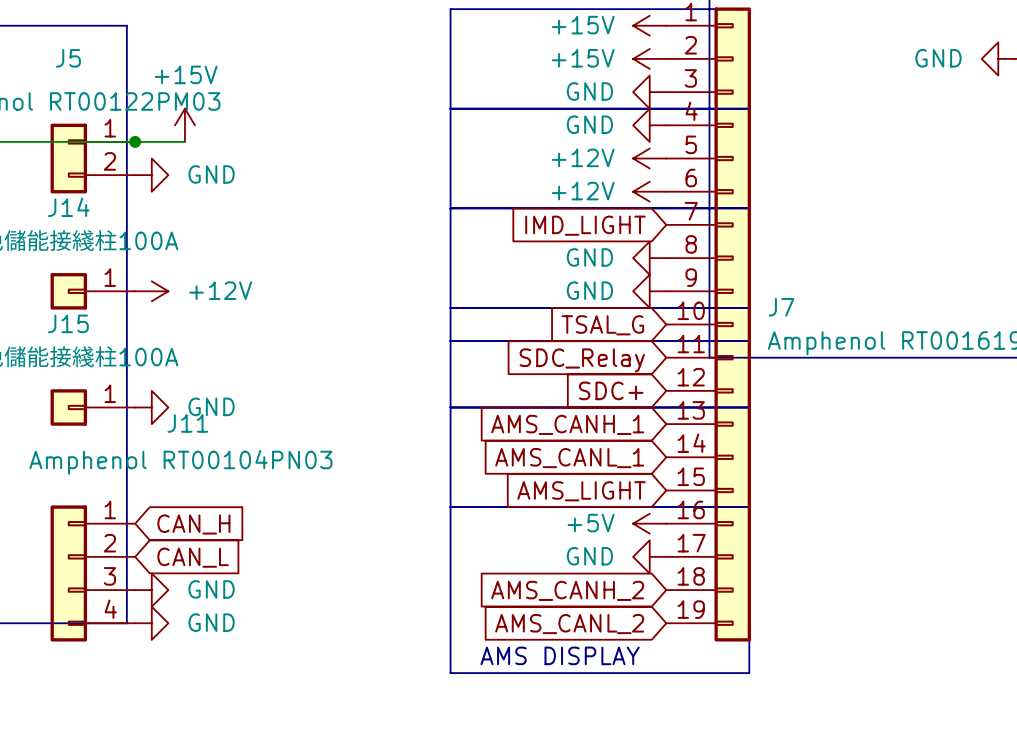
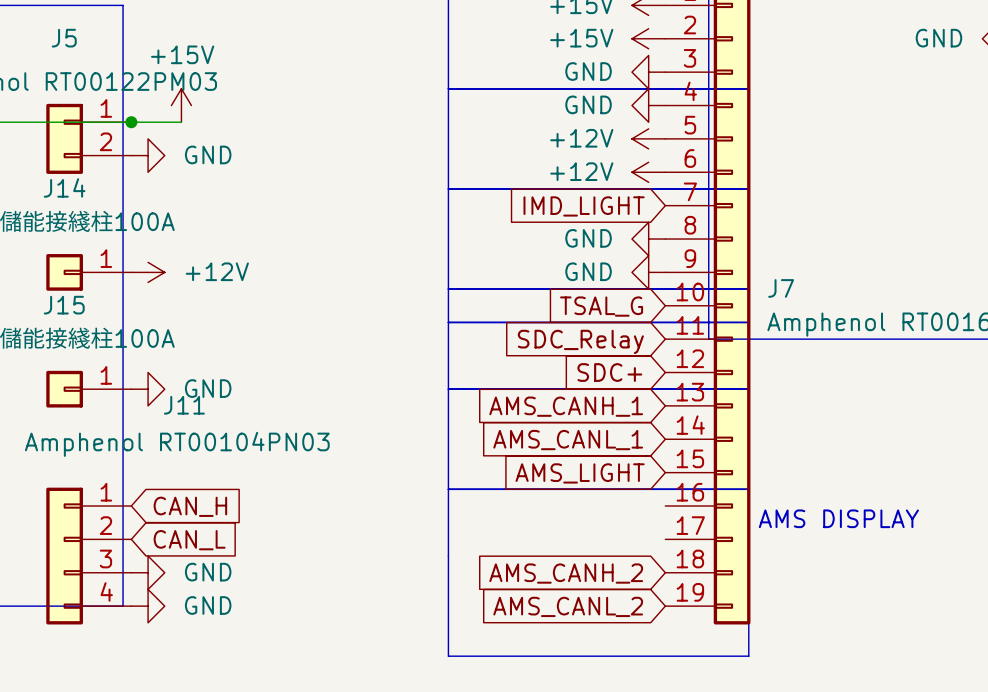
power symbol: +5V (649, 523) -> none
power symbol: GND (649, 556) -> none
text position: AMS DISPLAY (560, 655) -> AMS DISPLAY (838, 518)

